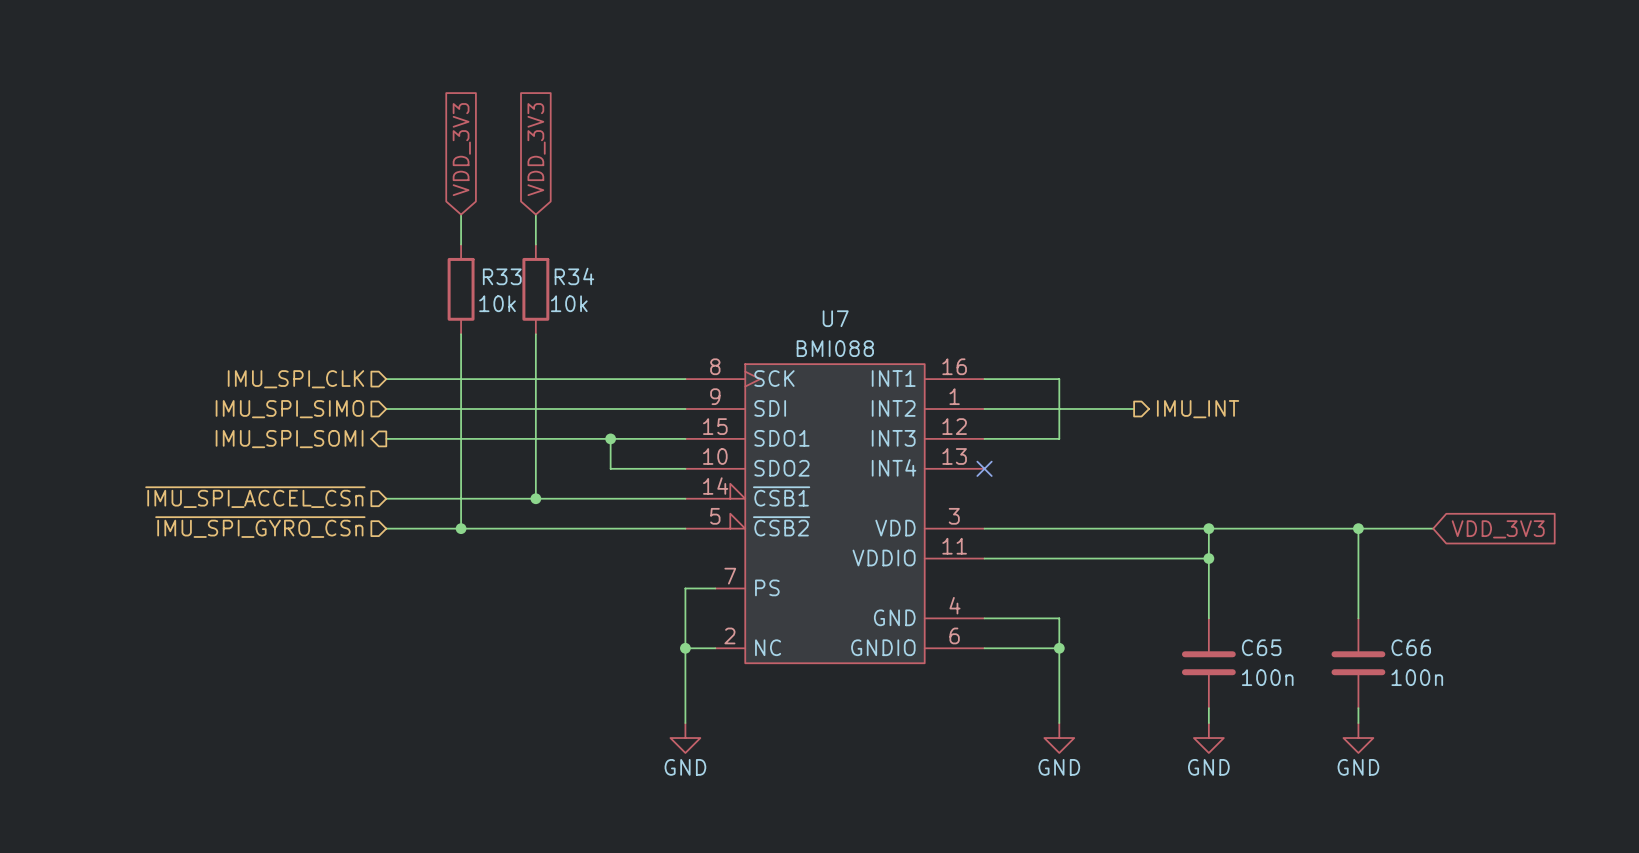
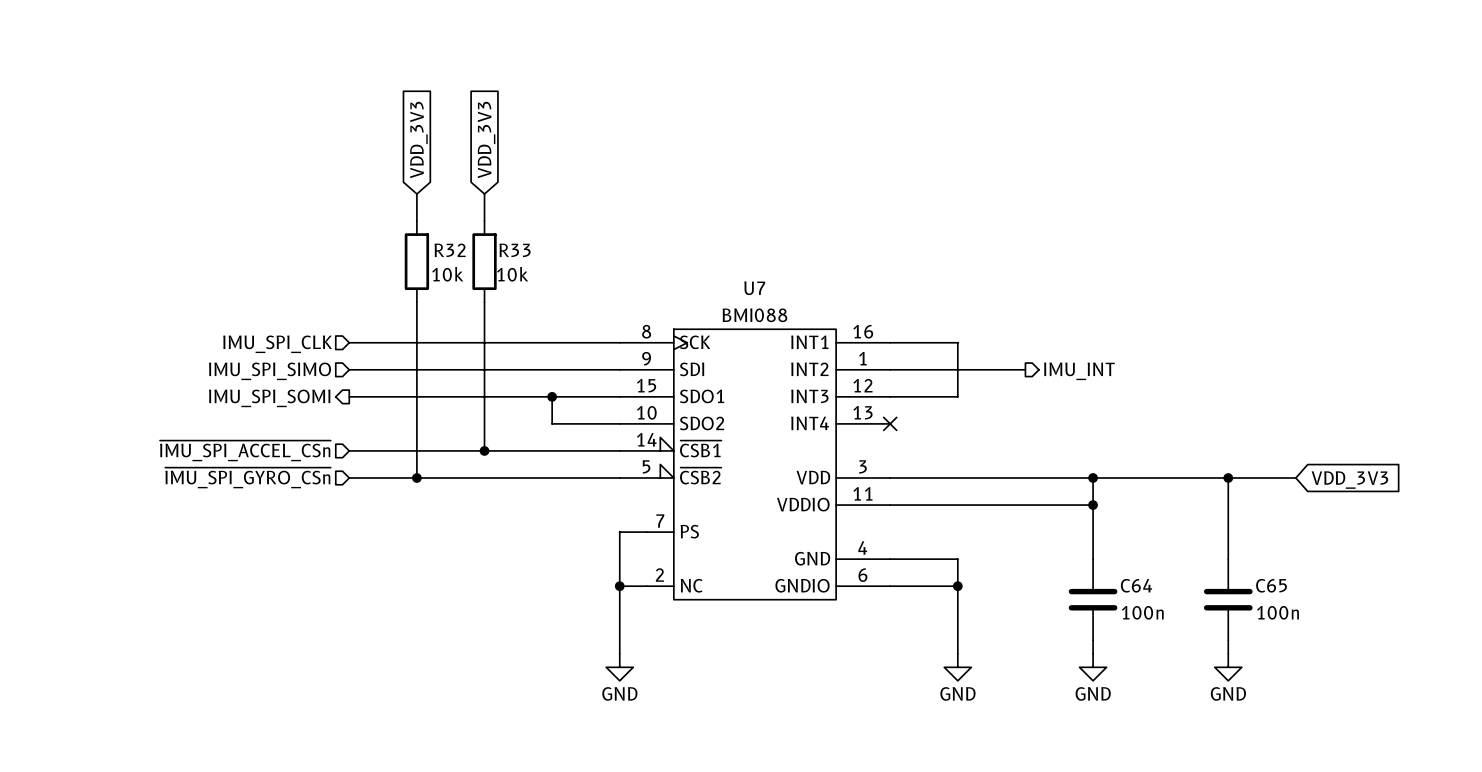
R33 name: R33 (502, 276) -> R32 (450, 250)
R34 name: R34 (574, 276) -> R33 (515, 250)
C65 name: C65 (1261, 647) -> C64 (1136, 585)
C66 name: C66 (1411, 647) -> C65 (1271, 585)

